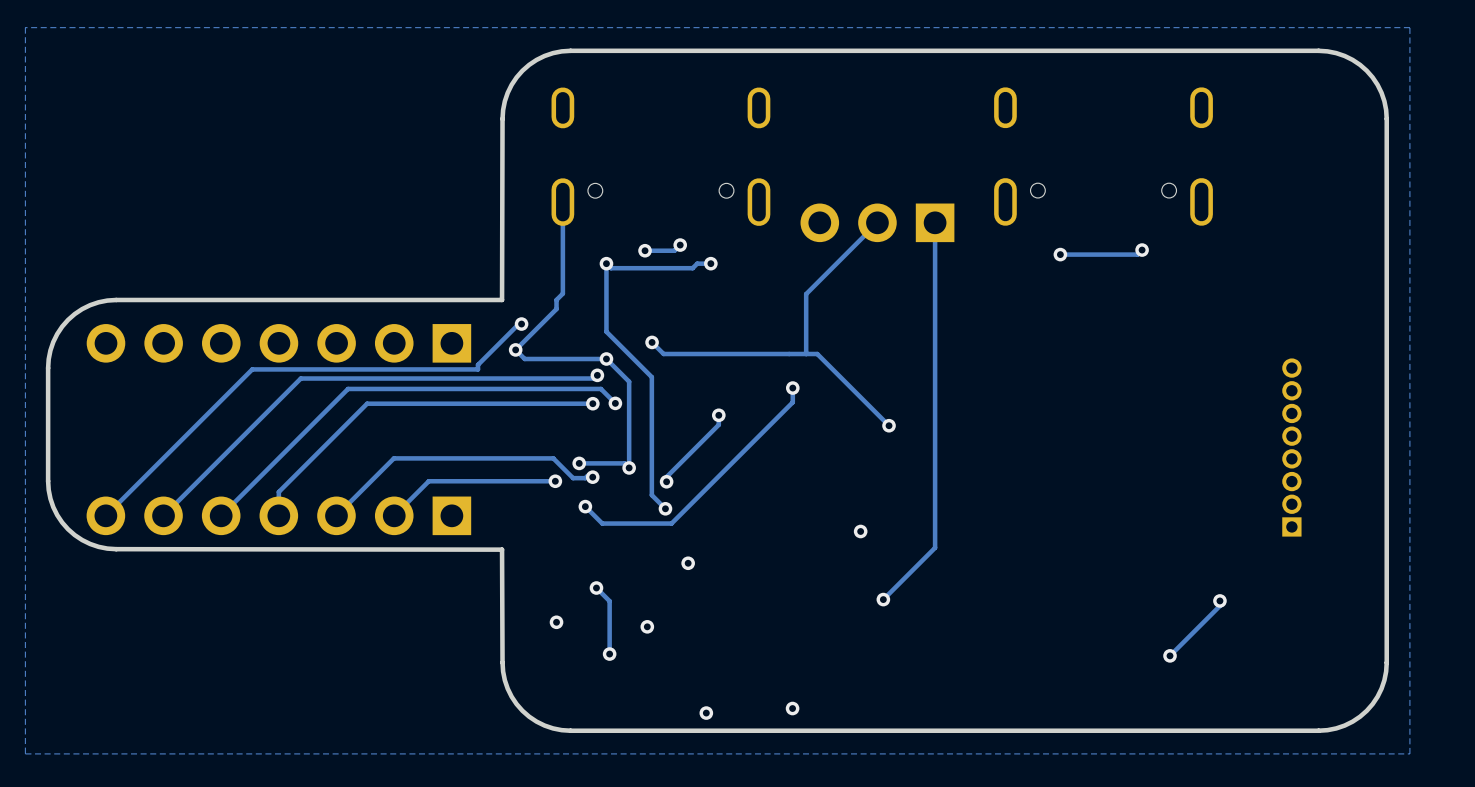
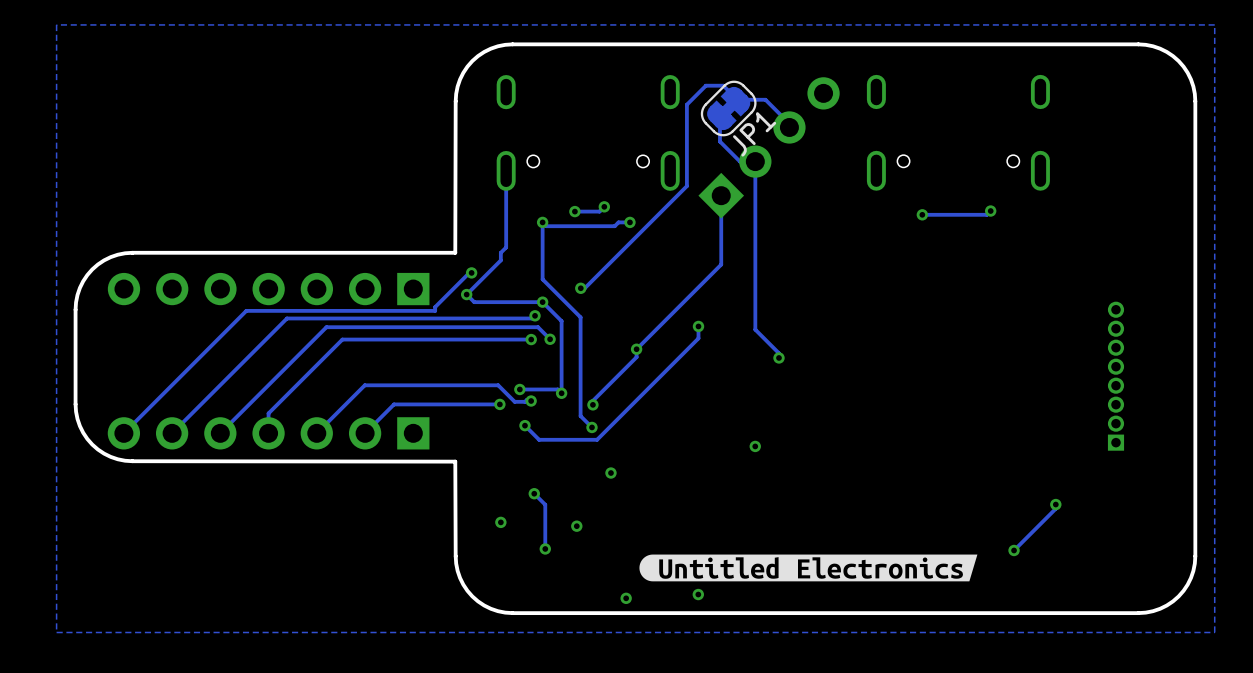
JP1: none -> (728, 108)
track: none -> (789, 127) (789, 123) (765, 99) (737, 99) (723, 85) (705, 85) (686, 104) (686, 186) (584, 288) (580, 288)
part: none -> (769, 147)
track: (877, 222) (806, 294) (806, 354) -> none
part: (877, 222) -> none
track: (935, 222) (935, 547) (883, 599) -> none
track: none -> (721, 195) (721, 264) (636, 349)
track: (652, 342) (663, 354) (817, 354) (889, 425) -> (719, 117) (719, 141) (740, 161) (755, 161) (755, 329) (778, 353) (778, 357)
via: (883, 599) -> none
drawing: none -> [639, 554, 978, 582]

